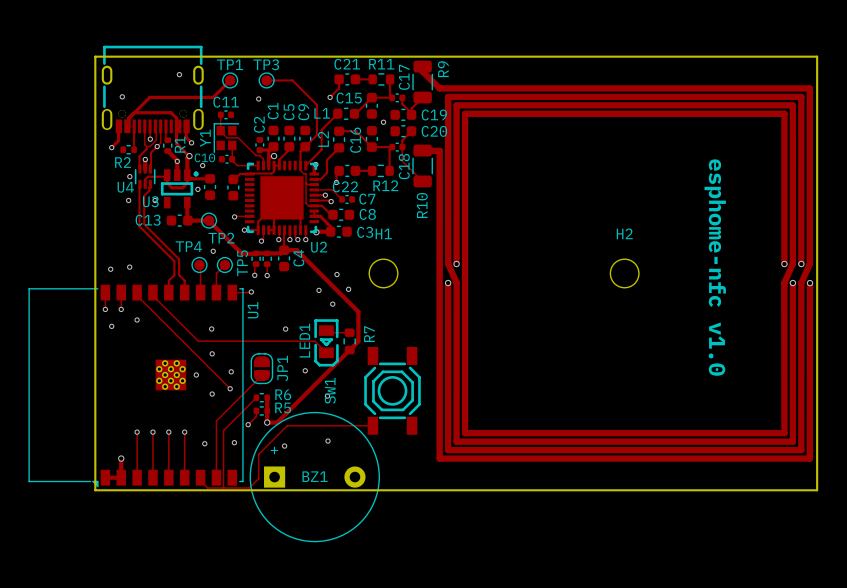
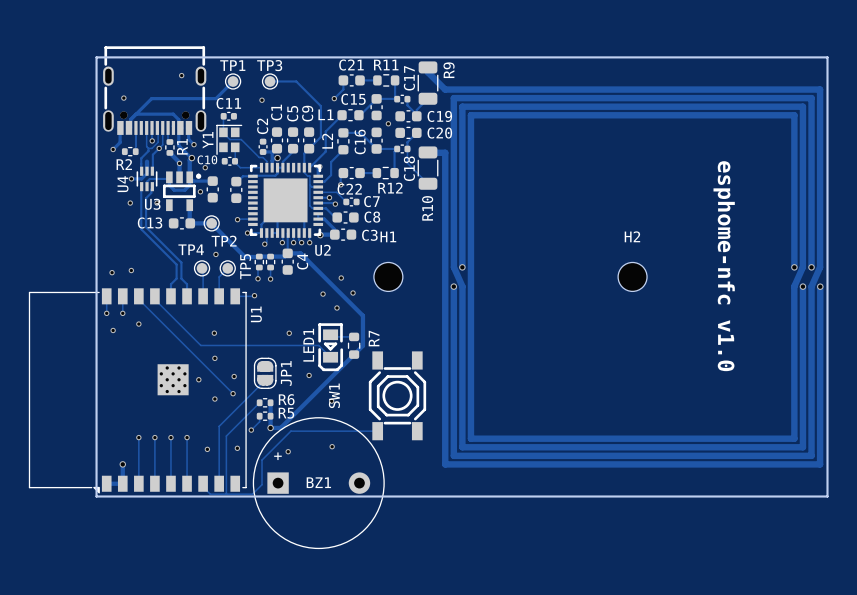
via: (145, 159) -> none
track: none -> (147, 173) (141, 178) (131, 178)
U4 name rotation: 0° (125, 187) -> 90° counterclockwise (123, 184)

